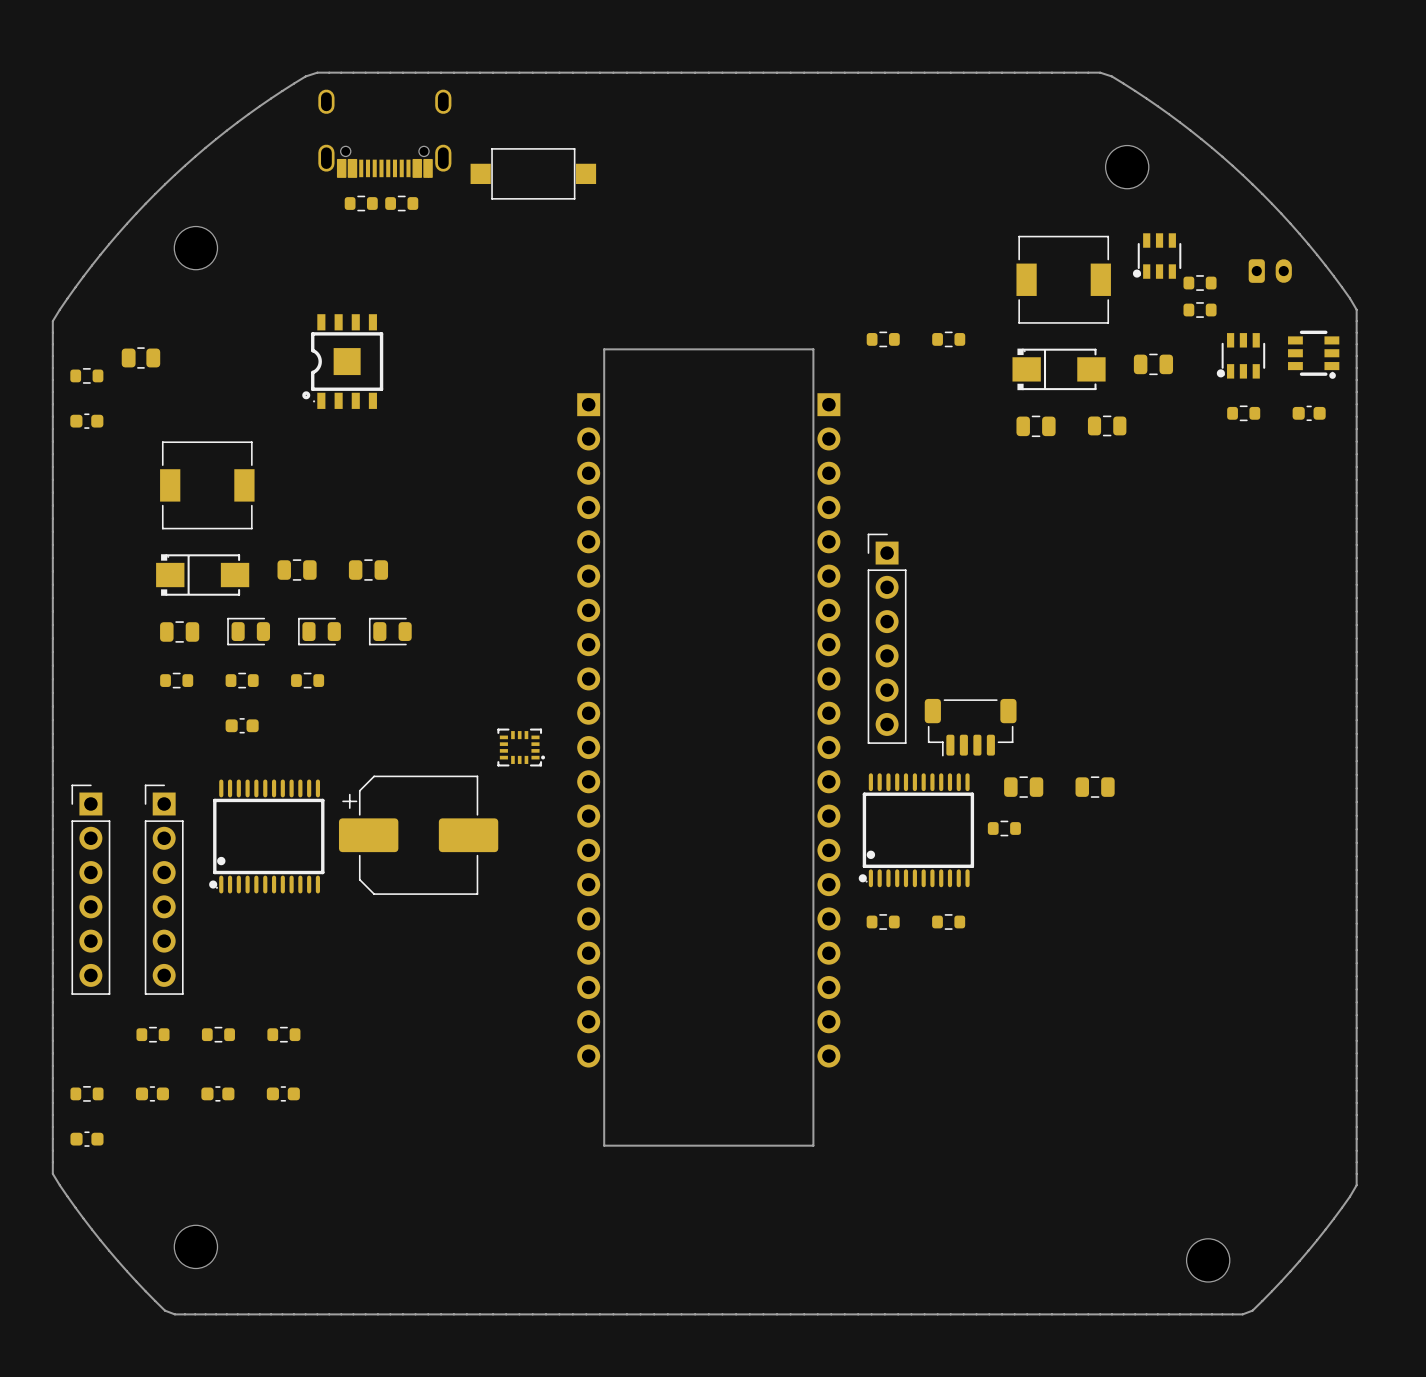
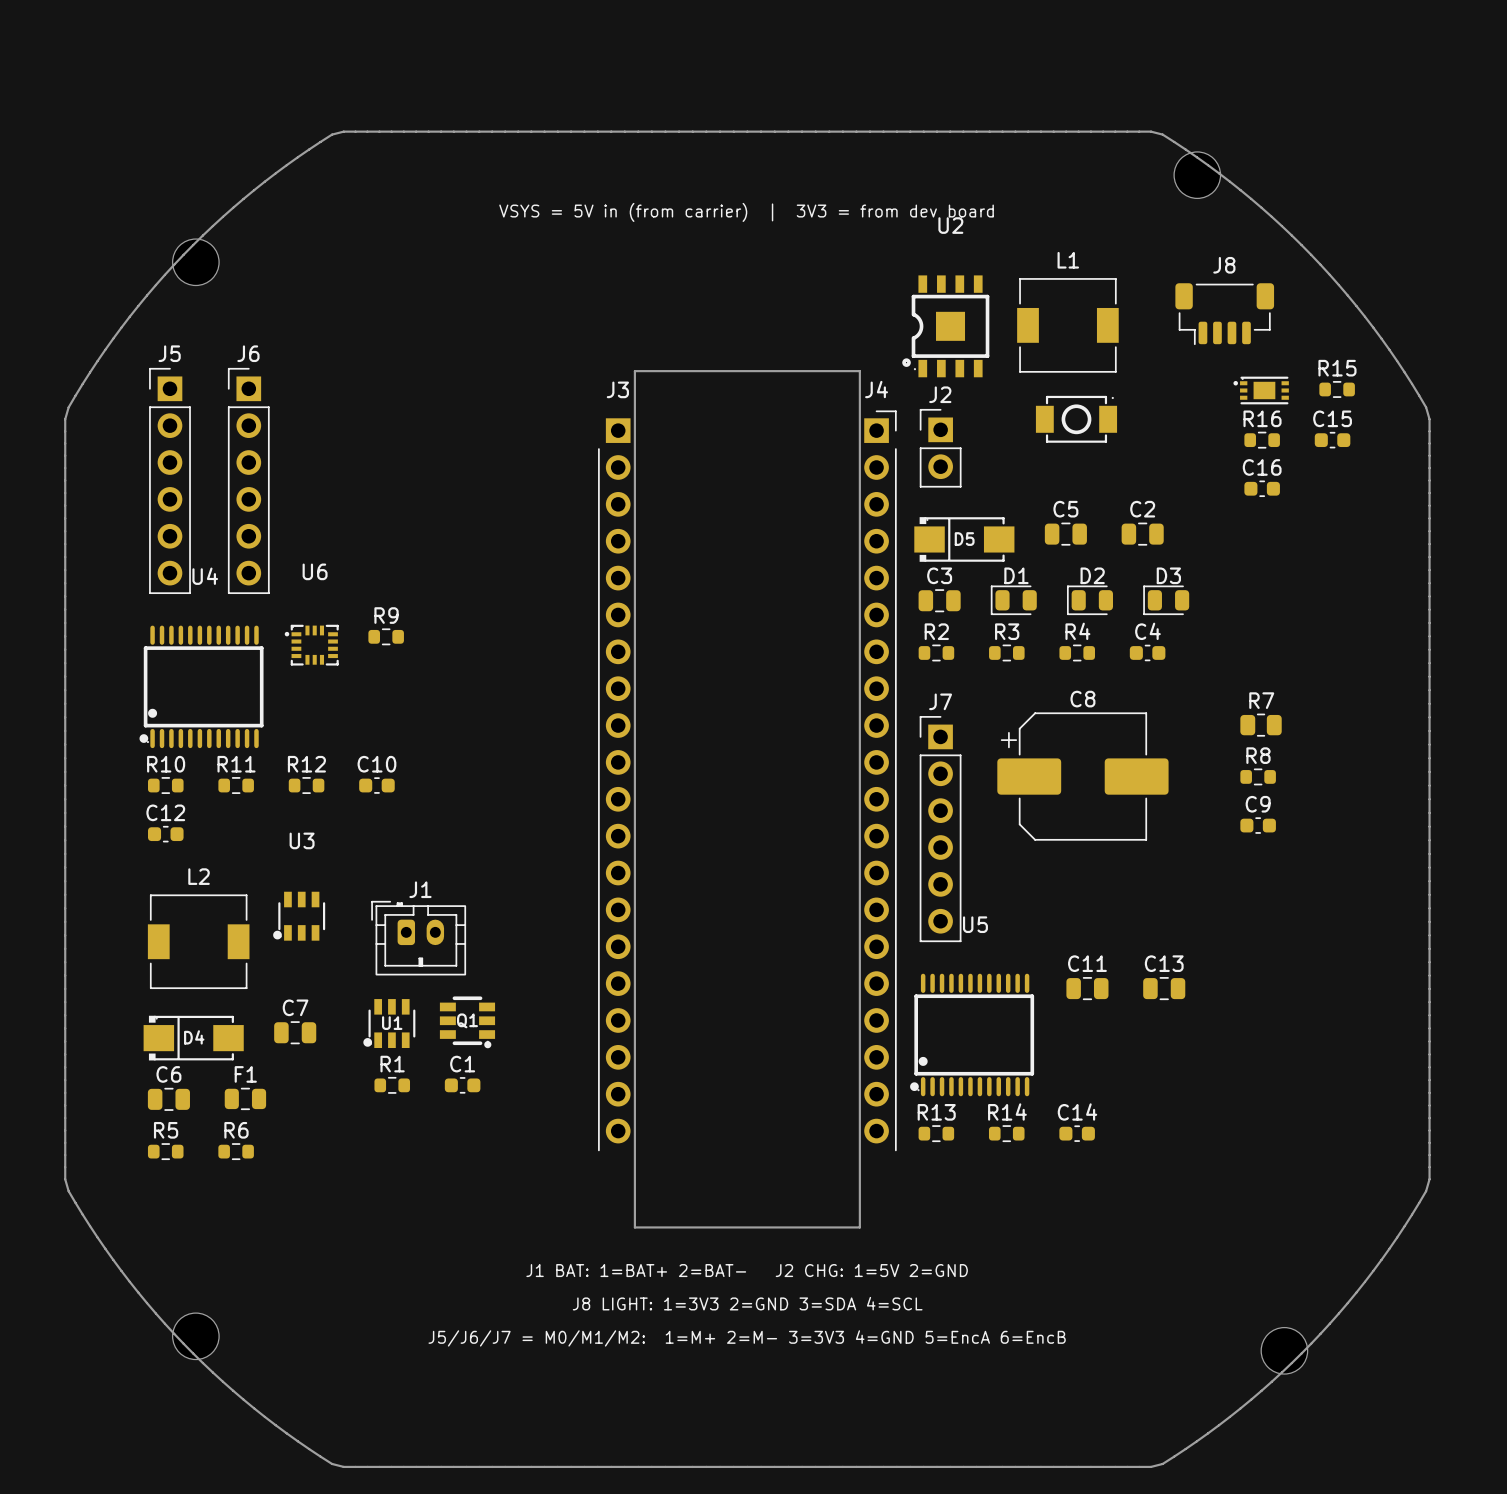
board edge: (317, 72) (305, 76) (248, 114) (174, 174) (109, 244) (75, 287) (52, 321) (52, 1173) (83, 1218) (145, 1291) (164, 1310) (174, 1314) (1242, 1314) (1252, 1310) (1308, 1250) (1342, 1207) (1356, 1185) (1356, 309) (1333, 276) (1281, 213) (1222, 156) (1157, 106) (1111, 76) (1100, 72) (317, 72) -> (343, 131) (332, 134) (264, 181) (222, 216) (183, 254) (147, 295) (113, 338) (75, 395) (68, 407) (65, 419) (65, 1179) (68, 1191) (82, 1214) (138, 1292) (202, 1363) (243, 1399) (286, 1433) (332, 1463) (343, 1466) (1151, 1466) (1162, 1463) (1208, 1433) (1251, 1399) (1320, 1333) (1356, 1292) (1389, 1248) (1426, 1191) (1429, 1179) (1429, 419) (1426, 407) (1412, 383) (1356, 306) (1291, 235) (1251, 198) (1208, 165) (1162, 134) (1151, 131) (343, 131)
part: (384, 133) -> none
part: (533, 173) -> none
text: none -> VSYS = 5V in (from carrier) | 3V3 = from dev board (746, 212)
part: (361, 203) -> none
part: (401, 203) -> none
part: (1157, 256) -> none
part: (1270, 271) -> none
part: (1063, 279) -> none
part: (1200, 283) -> none
J8: none -> (1224, 314)
L1: none -> (1067, 325)
U2: none -> (945, 326)
part: (1200, 310) -> none
part: (883, 339) -> none
part: (948, 339) -> none
part: (1313, 354) -> none
part: (1241, 355) -> none
part: (140, 357) -> none
part: (342, 361) -> none
part: (1153, 364) -> none
R15: none -> (1337, 389)
part: none -> (1261, 390)
part: (1059, 369) -> none
part: (86, 375) -> none
part: none -> (1076, 419)
R16: none -> (1262, 440)
part: (1243, 413) -> none
C15: none -> (1332, 440)
part: (1309, 413) -> none
part: (86, 421) -> none
J2: none -> (940, 448)
part: (1107, 425) -> none
part: (1036, 426) -> none
J5: none -> (169, 480)
J6: none -> (248, 480)
C16: none -> (1262, 488)
part: (207, 485) -> none
C5: none -> (1065, 534)
C2: none -> (1142, 534)
D5: none -> (964, 539)
C3: none -> (939, 600)
D1: none -> (1013, 600)
D2: none -> (1089, 600)
D3: none -> (1166, 600)
part: (297, 570) -> none
part: (368, 570) -> none
part: (202, 575) -> none
R9: none -> (386, 636)
U6: none -> (311, 645)
R2: none -> (936, 652)
R3: none -> (1006, 652)
R4: none -> (1077, 652)
C4: none -> (1147, 652)
part: (179, 631) -> none
part: (248, 631) -> none
part: (319, 631) -> none
part: (390, 631) -> none
part: (887, 638) -> none
U4: none -> (201, 686)
R7: none -> (1261, 725)
part: (176, 680) -> none
part: (242, 680) -> none
part: (307, 680) -> none
part: (242, 725) -> none
C8: none -> (1082, 776)
R8: none -> (1258, 776)
part: (970, 727) -> none
J4: none -> (880, 780)
R10: none -> (165, 785)
R11: none -> (236, 785)
R12: none -> (306, 785)
C10: none -> (376, 785)
J3: none -> (614, 784)
part: (521, 747) -> none
C9: none -> (1258, 825)
J7: none -> (940, 829)
C12: none -> (165, 834)
part: (1023, 787) -> none
part: (1095, 787) -> none
part: (1004, 828) -> none
part: (916, 830) -> none
part: (418, 835) -> none
part: (266, 836) -> none
U3: none -> (299, 916)
J1: none -> (418, 938)
L2: none -> (198, 941)
part: (90, 889) -> none
part: (164, 889) -> none
part: (883, 921) -> none
part: (948, 921) -> none
C11: none -> (1087, 988)
C13: none -> (1164, 988)
Q1: none -> (467, 1022)
U1: none -> (389, 1023)
C7: none -> (295, 1032)
U5: none -> (972, 1034)
D4: none -> (193, 1038)
R1: none -> (392, 1085)
C1: none -> (462, 1085)
C6: none -> (168, 1099)
F1: none -> (245, 1098)
part: (152, 1034) -> none
part: (218, 1034) -> none
part: (283, 1034) -> none
R13: none -> (936, 1133)
R14: none -> (1006, 1133)
C14: none -> (1077, 1133)
R5: none -> (165, 1151)
R6: none -> (236, 1151)
part: (86, 1093) -> none
part: (152, 1093) -> none
part: (217, 1093) -> none
part: (283, 1093) -> none
part: (86, 1139) -> none
text: none -> J1 BAT: 1=BAT+ 2=BAT- J2 CHG: 1=5V 2=GND (747, 1270)
text: none -> J8 LIGHT: 1=3V3 2=GND 3=SDA 4=SCL (747, 1303)
text: none -> J5/J6/J7 = M0/M1/M2: 1=M+ 2=M- 3=3V3 4=GND 5=EncA 6=EncB (747, 1338)

